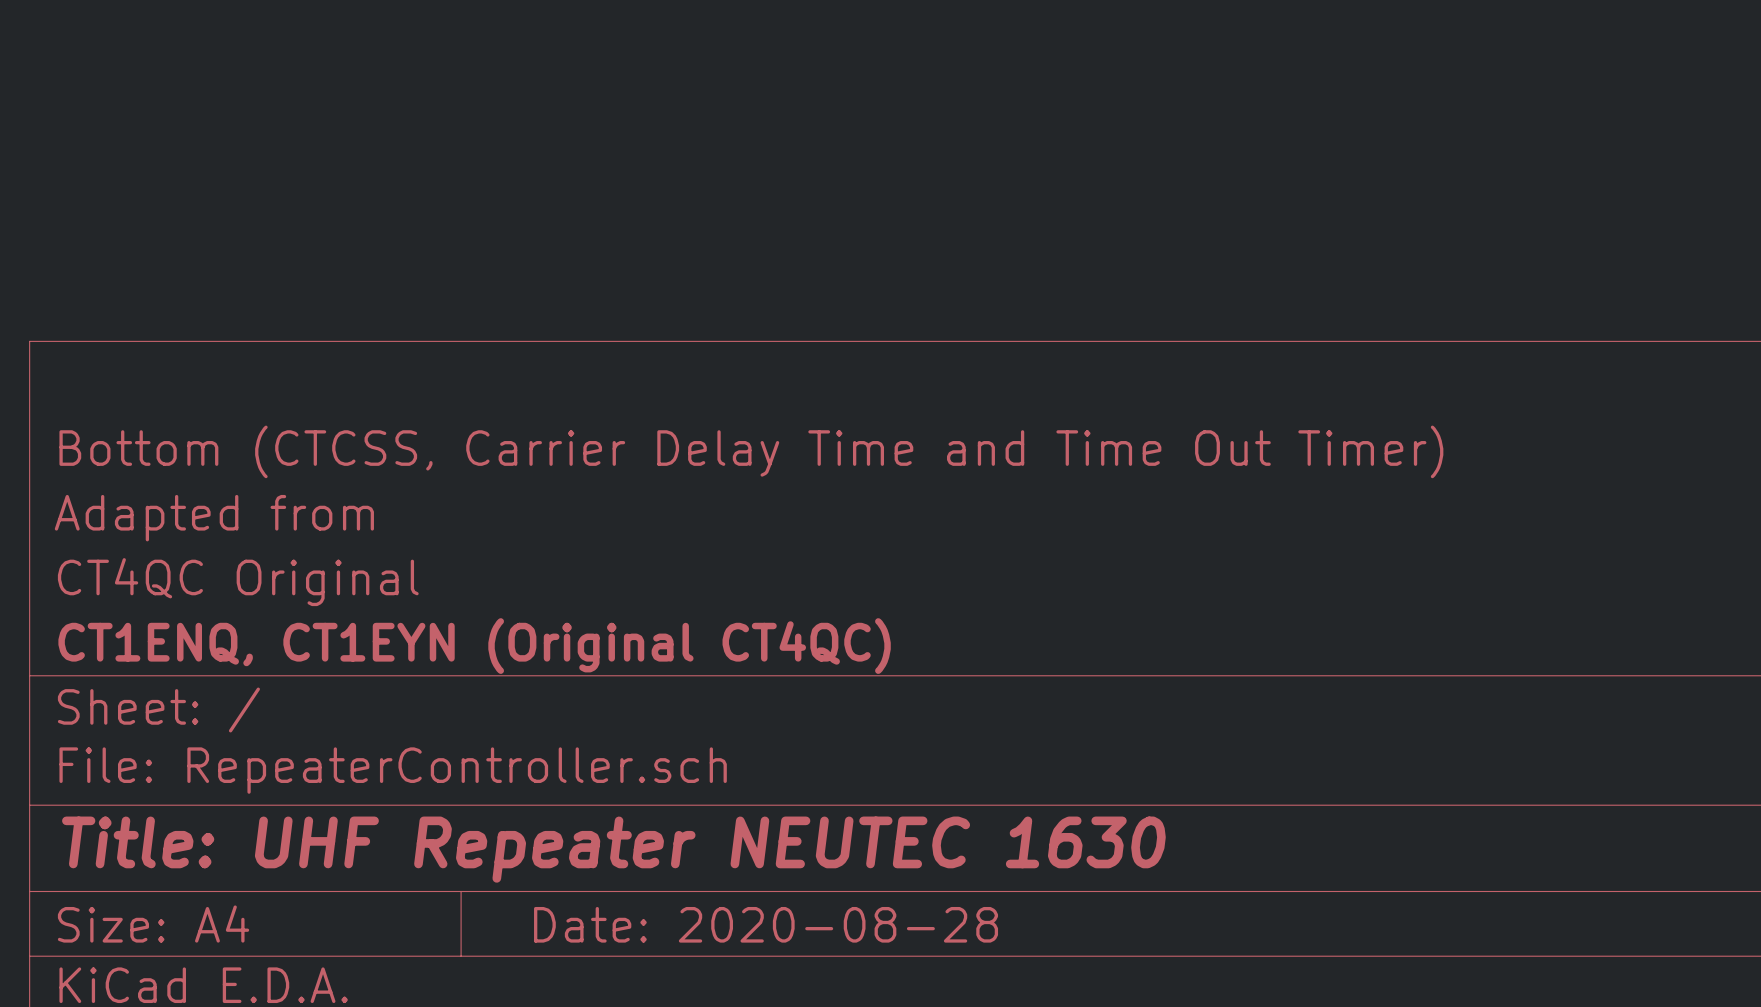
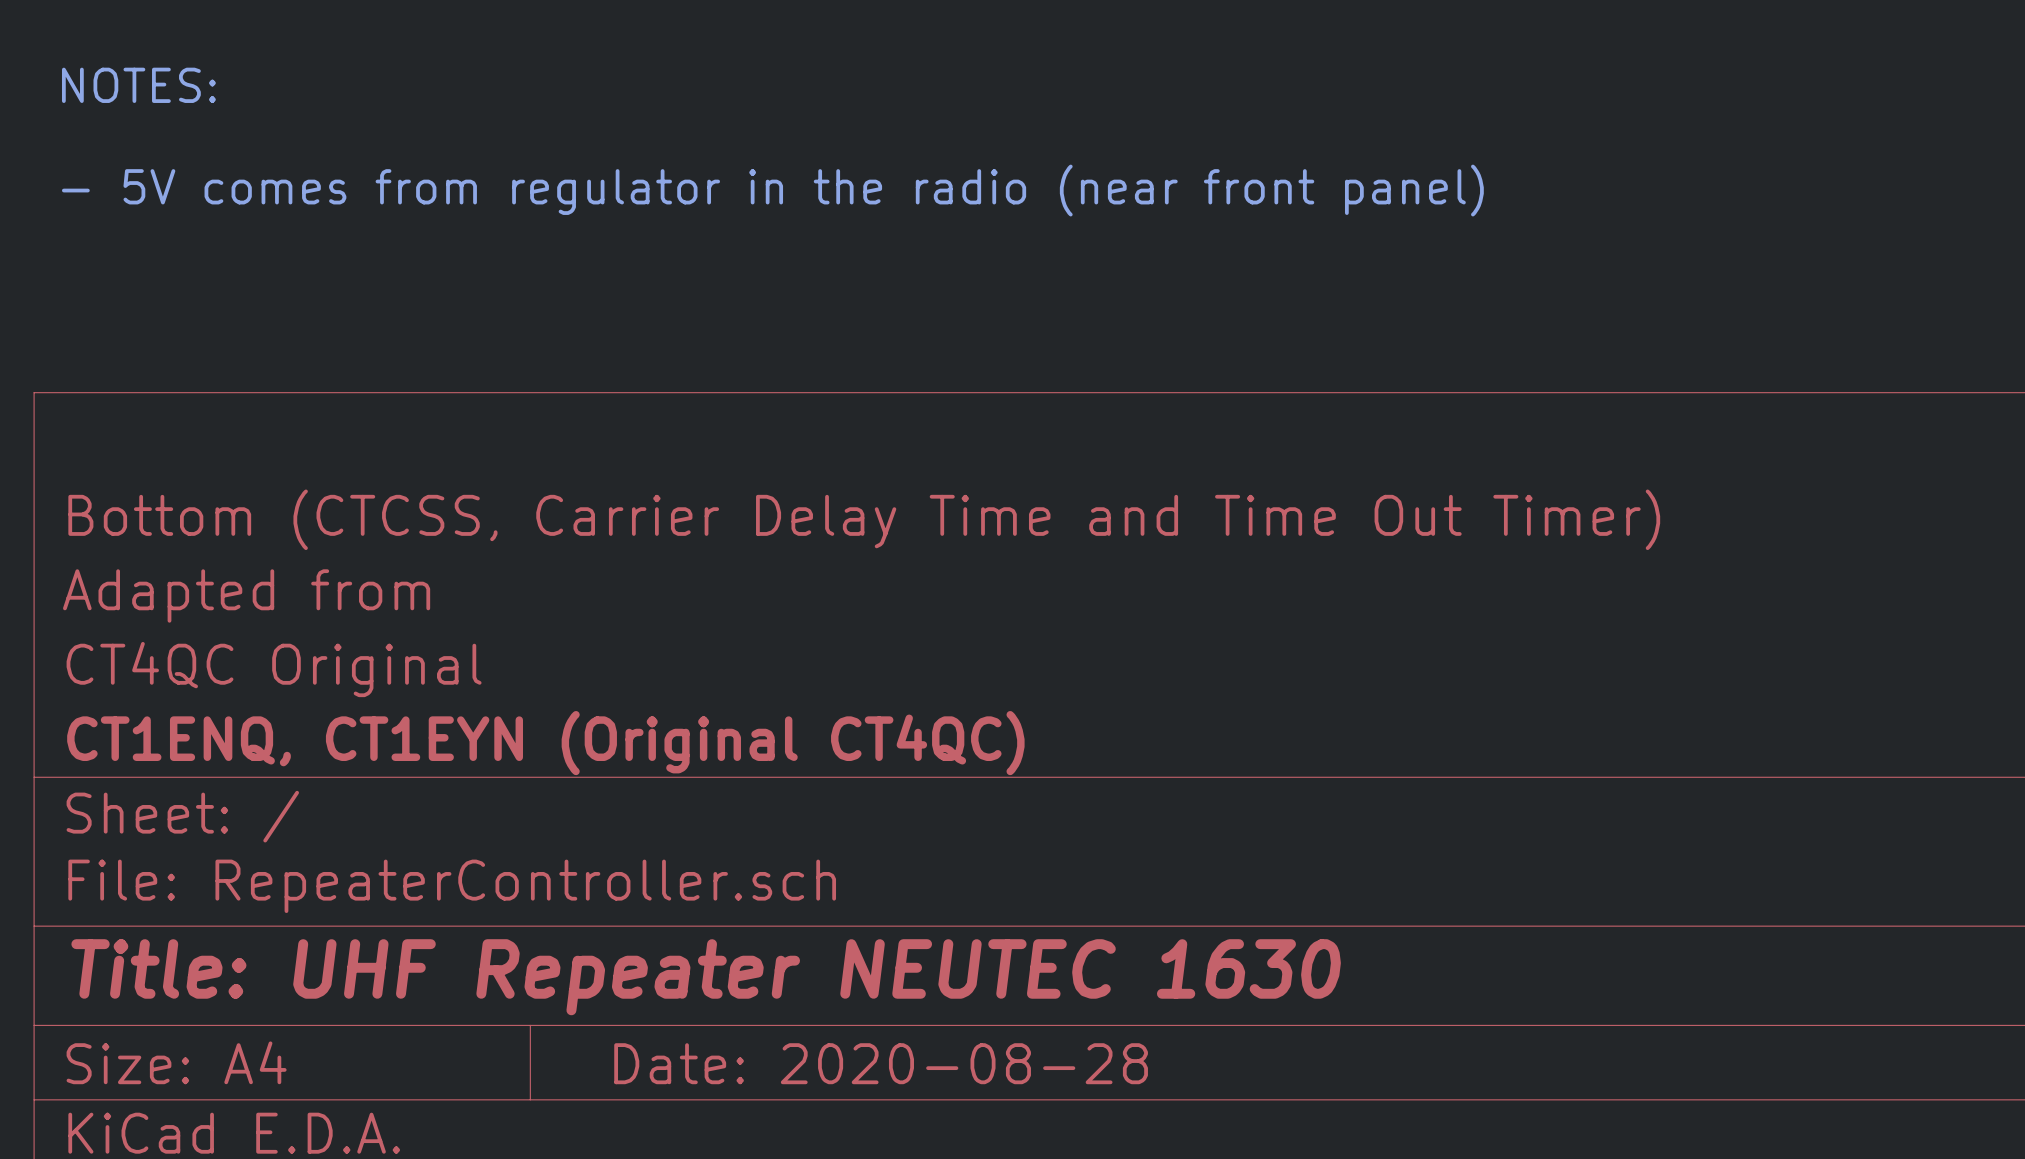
text: none -> NOTES: (138, 85)
text: none -> - 5V comes from regulator in the radio (near front panel) (772, 190)

